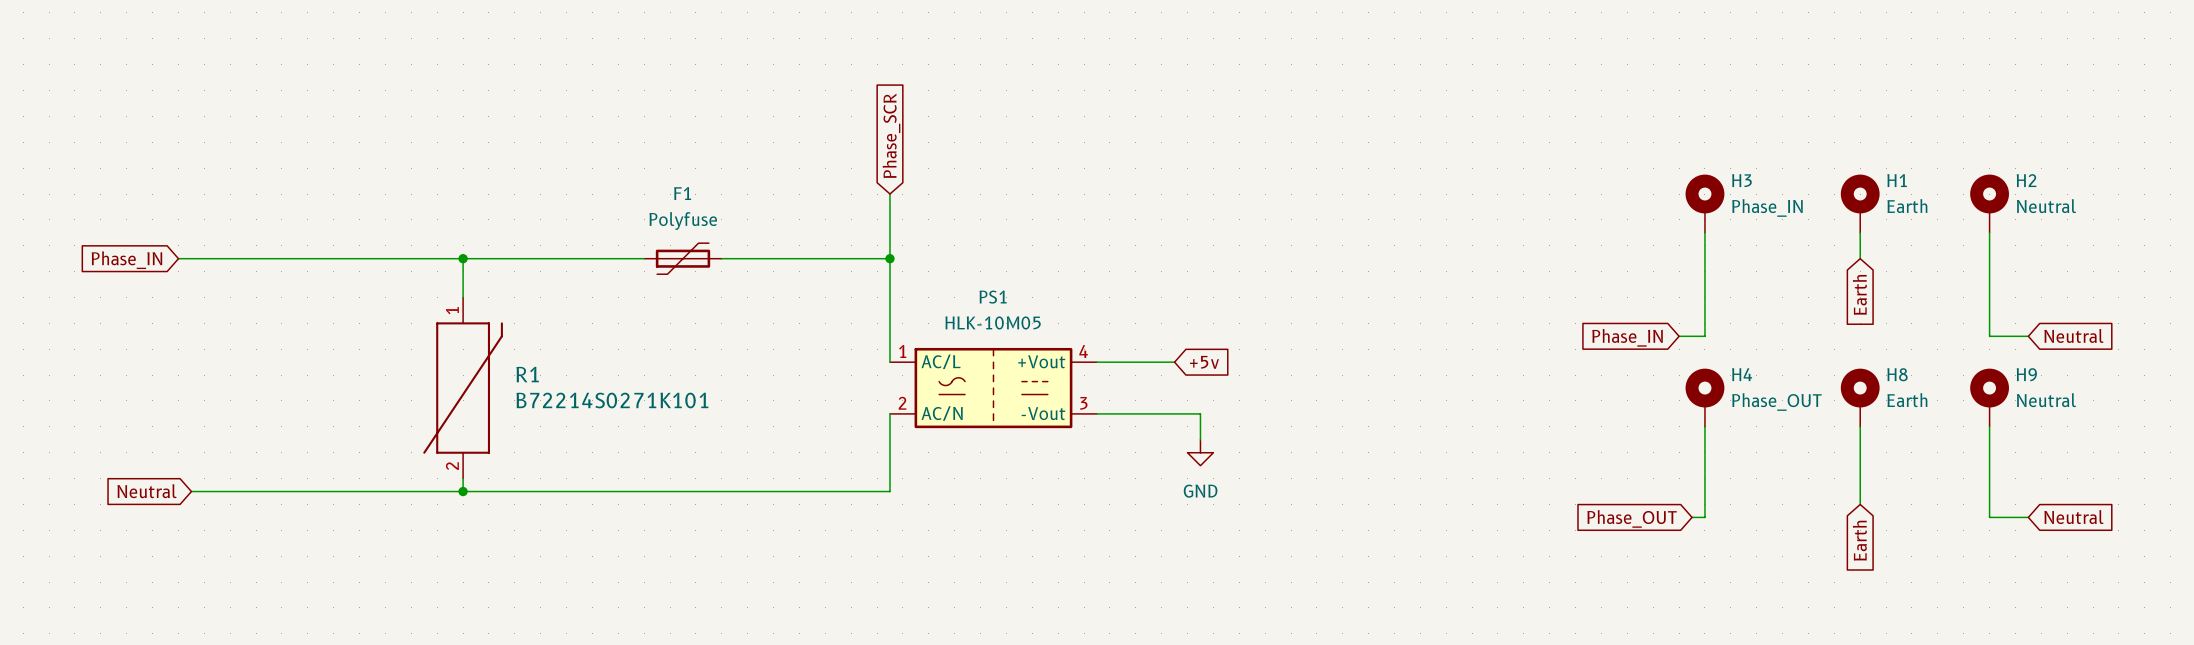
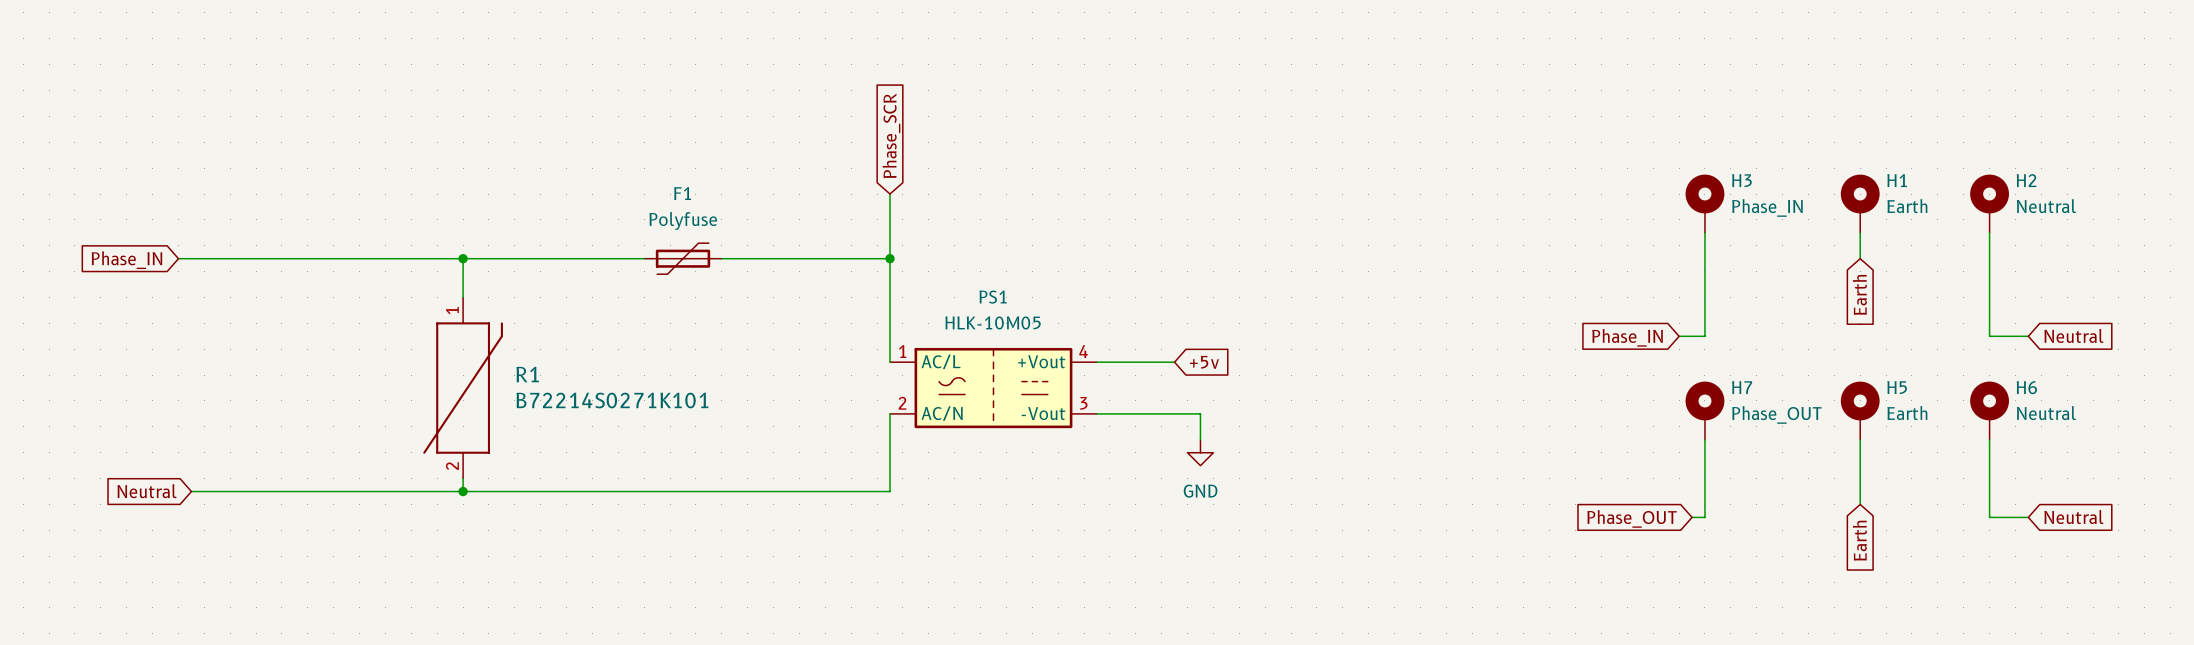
H4: Phase_OUT (1704, 397) -> none
H8: Earth (1860, 397) -> none
H9: Neutral (1989, 397) -> none
H7: none -> Phase_OUT (1704, 410)
H5: none -> Earth (1860, 410)
H6: none -> Neutral (1989, 410)

